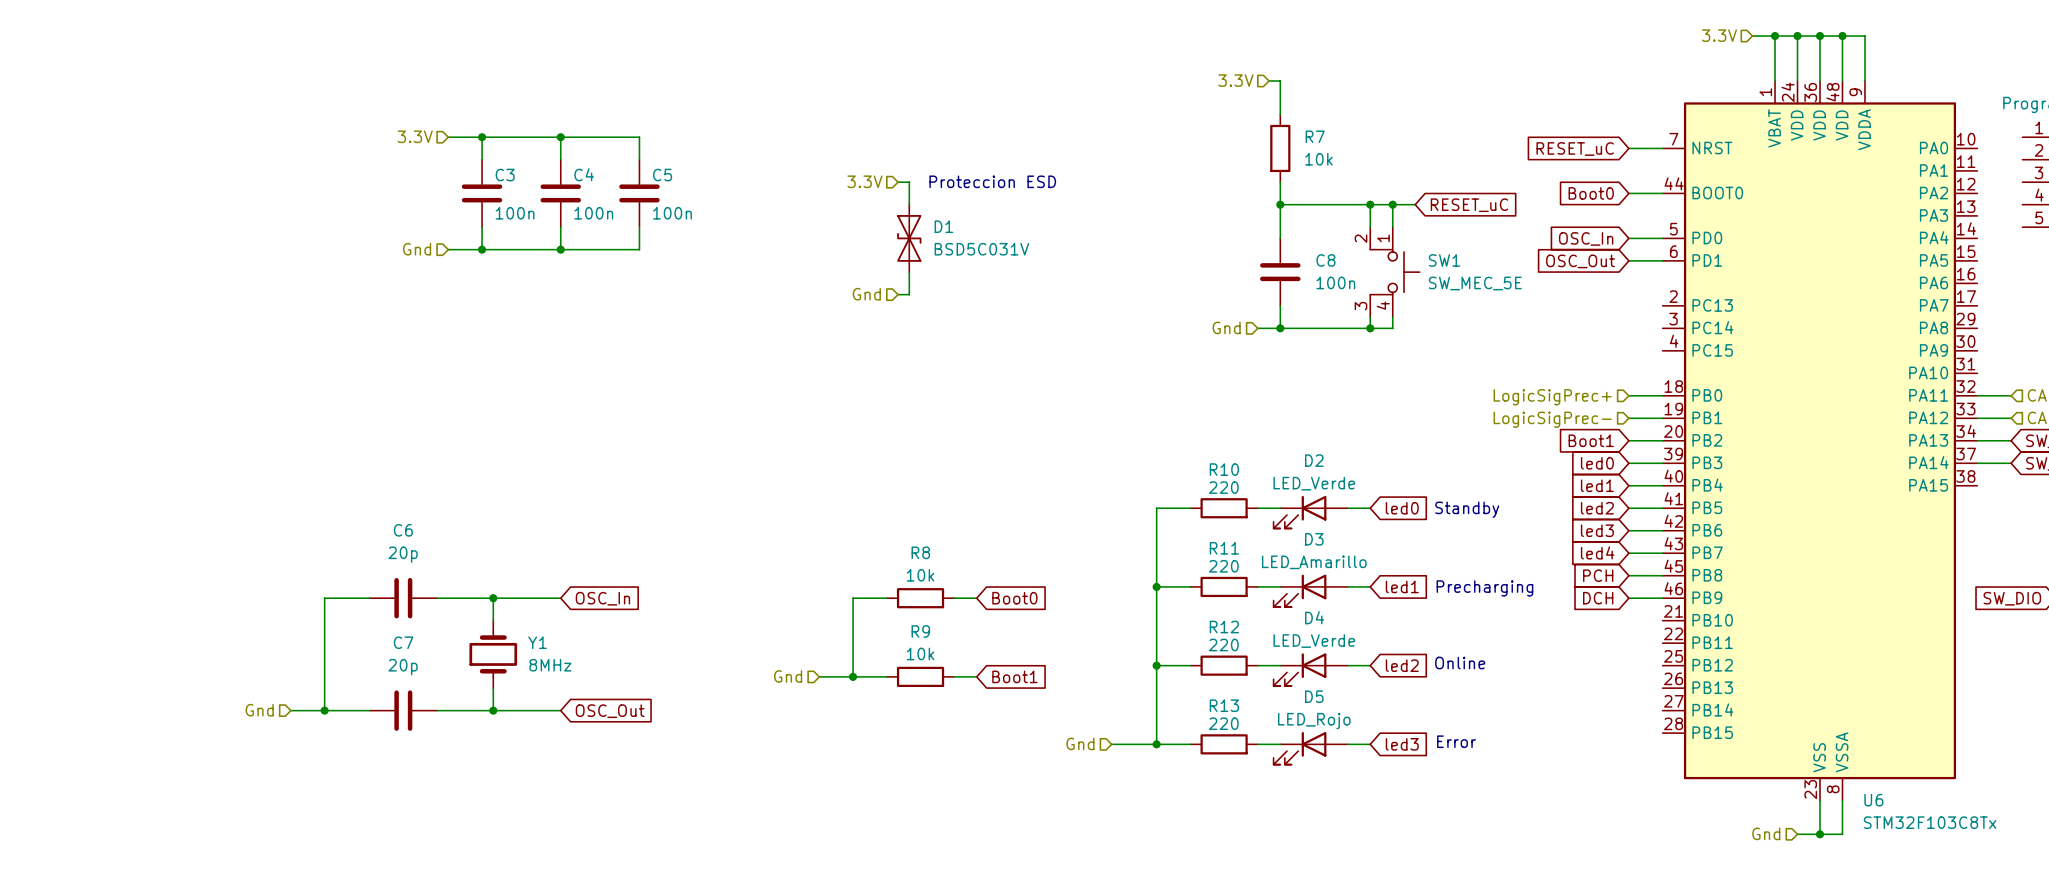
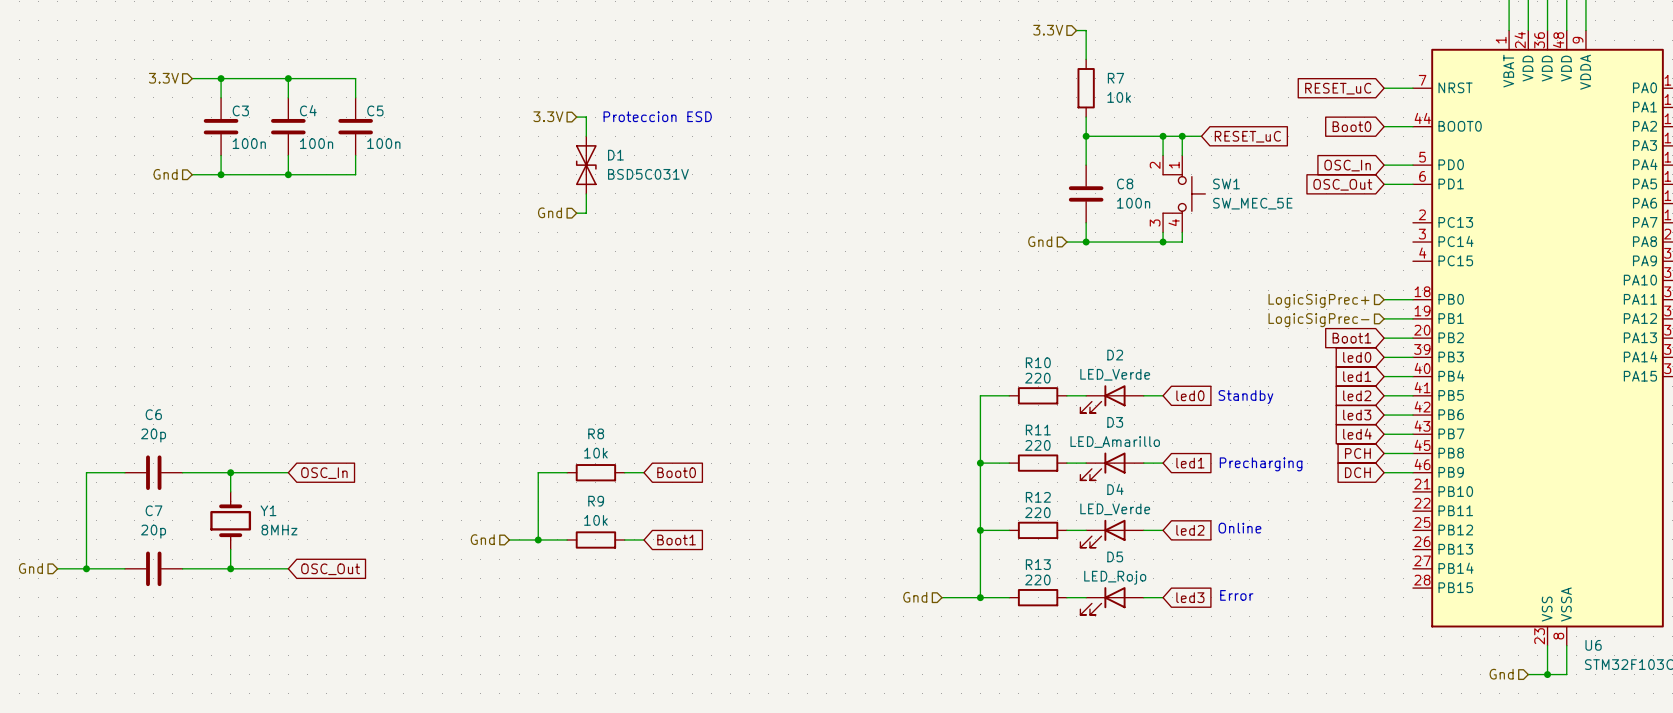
hierarchical label: none -> 3.3V (163, 78)
hierarchical label: 3.3V (415, 136) -> none
junction: none -> (221, 78)
junction: none -> (288, 78)
wire: (448, 137) (639, 137) (639, 159) -> (192, 78) (355, 78) (355, 97)
wire: (482, 137) (482, 159) -> (221, 78) (221, 97)
junction: (482, 137) -> none
wire: (560, 137) (560, 159) -> (288, 78) (288, 97)
junction: (560, 137) -> none
hierarchical label: none -> 3.3V (548, 116)
hierarchical label: 3.3V (864, 181) -> none
text position: Proteccion ESD (992, 181) -> Proteccion ESD (657, 116)
wire: (898, 182) (909, 182) (909, 204) -> (576, 117) (586, 117) (586, 136)
C3 position: (482, 193) -> (221, 126)
C4 position: (560, 193) -> (288, 126)
C5 position: (639, 193) -> (355, 126)
wire: (482, 227) (482, 249) -> (221, 155) (221, 174)
wire: (560, 227) (560, 249) -> (288, 155) (288, 174)
wire: (639, 227) (639, 249) (448, 249) -> (355, 155) (355, 174) (192, 174)
D1 position: (909, 238) -> (586, 165)
hierarchical label: none -> Gnd (165, 174)
junction: none -> (221, 174)
junction: none -> (288, 174)
hierarchical label: Gnd (417, 249) -> none
junction: (482, 249) -> none
junction: (560, 249) -> none
wire: (909, 272) (909, 294) (898, 294) -> (586, 193) (586, 213) (576, 213)
hierarchical label: none -> Gnd (550, 212)
hierarchical label: Gnd (866, 294) -> none
wire: none -> (124, 472) (86, 472) (86, 568)
junction: none -> (230, 472)
wire: (324, 598) (324, 710) -> (269, 472) (182, 472)
wire: (347, 598) (369, 598) -> none
C6 position: (403, 598) -> (153, 472)
wire: (437, 598) (560, 598) -> none
wire: (493, 598) (493, 620) -> (230, 472) (230, 491)
junction: (493, 598) -> none
global label position: OSC_In (602, 598) -> OSC_In (324, 473)
wire: (886, 598) (853, 598) (853, 676) -> (567, 472) (538, 472) (538, 539)
R8 position: (920, 598) -> (595, 472)
wire: (954, 598) (976, 598) -> (624, 472) (643, 472)
global label position: Boot0 (1014, 598) -> Boot0 (676, 472)
Y1 position: (493, 654) -> (230, 520)
hierarchical label: none -> Gnd (482, 539)
junction: none -> (538, 539)
hierarchical label: Gnd (788, 676) -> none
wire: (819, 676) (886, 676) -> (509, 539) (567, 539)
junction: (853, 676) -> none
R9 position: (920, 676) -> (595, 539)
wire: (954, 676) (976, 676) -> (624, 539) (643, 539)
global label position: Boot1 (1014, 676) -> Boot1 (676, 539)
wire: (493, 688) (493, 710) -> (230, 549) (230, 568)
hierarchical label: none -> Gnd (30, 568)
wire: none -> (57, 568) (124, 568)
junction: none -> (86, 568)
wire: none -> (182, 568) (240, 568)
hierarchical label: Gnd (259, 710) -> none
junction position: (324, 710) -> (230, 568)
wire: (347, 710) (369, 710) -> none
C7 position: (403, 710) -> (153, 568)
wire: (437, 710) (560, 710) -> none
junction: (493, 710) -> none
global label position: OSC_Out (610, 711) -> OSC_Out (330, 569)

